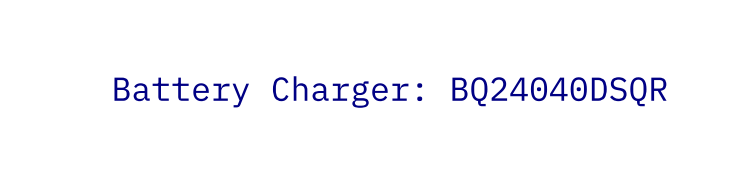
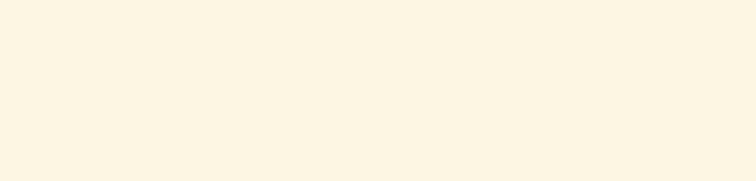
text: Battery Charger: BQ24040DSQR (390, 92) -> none

